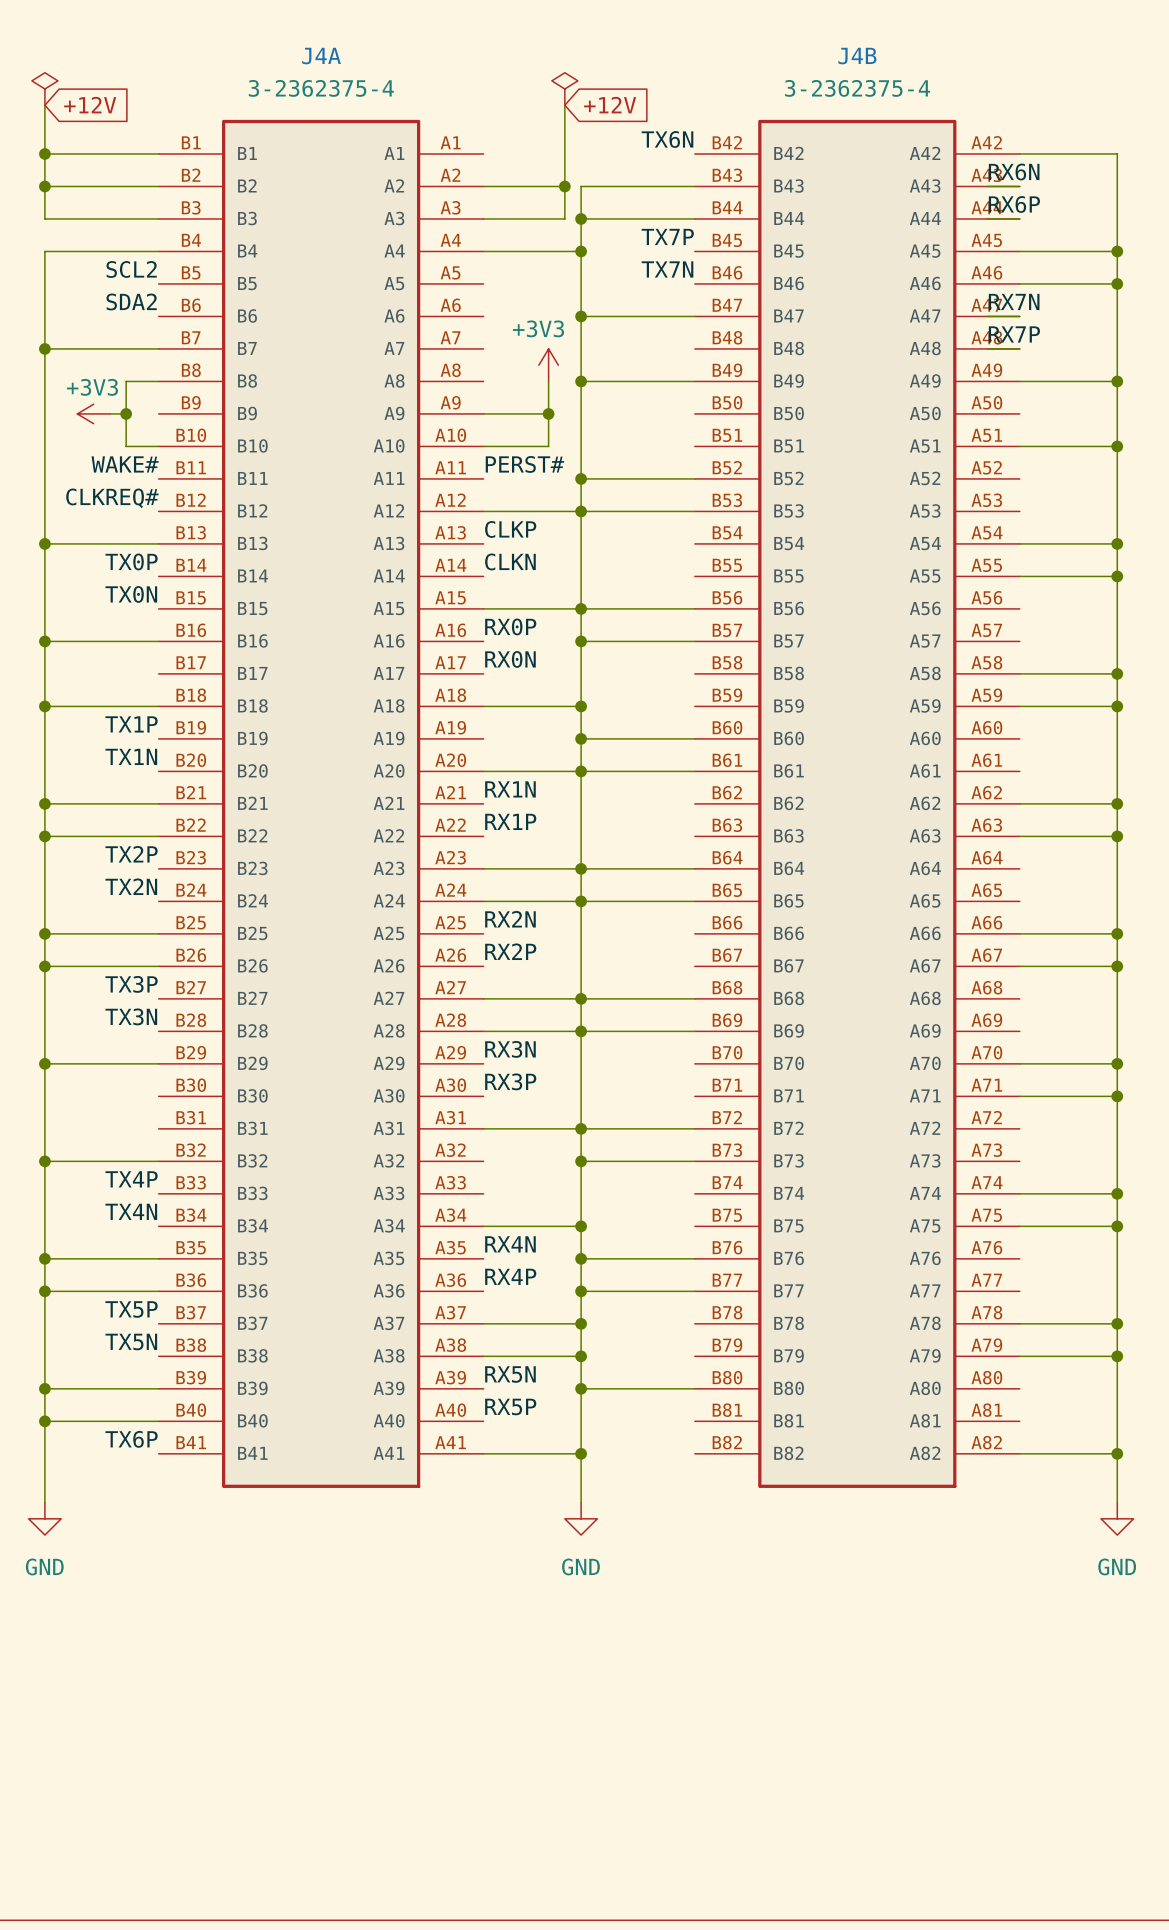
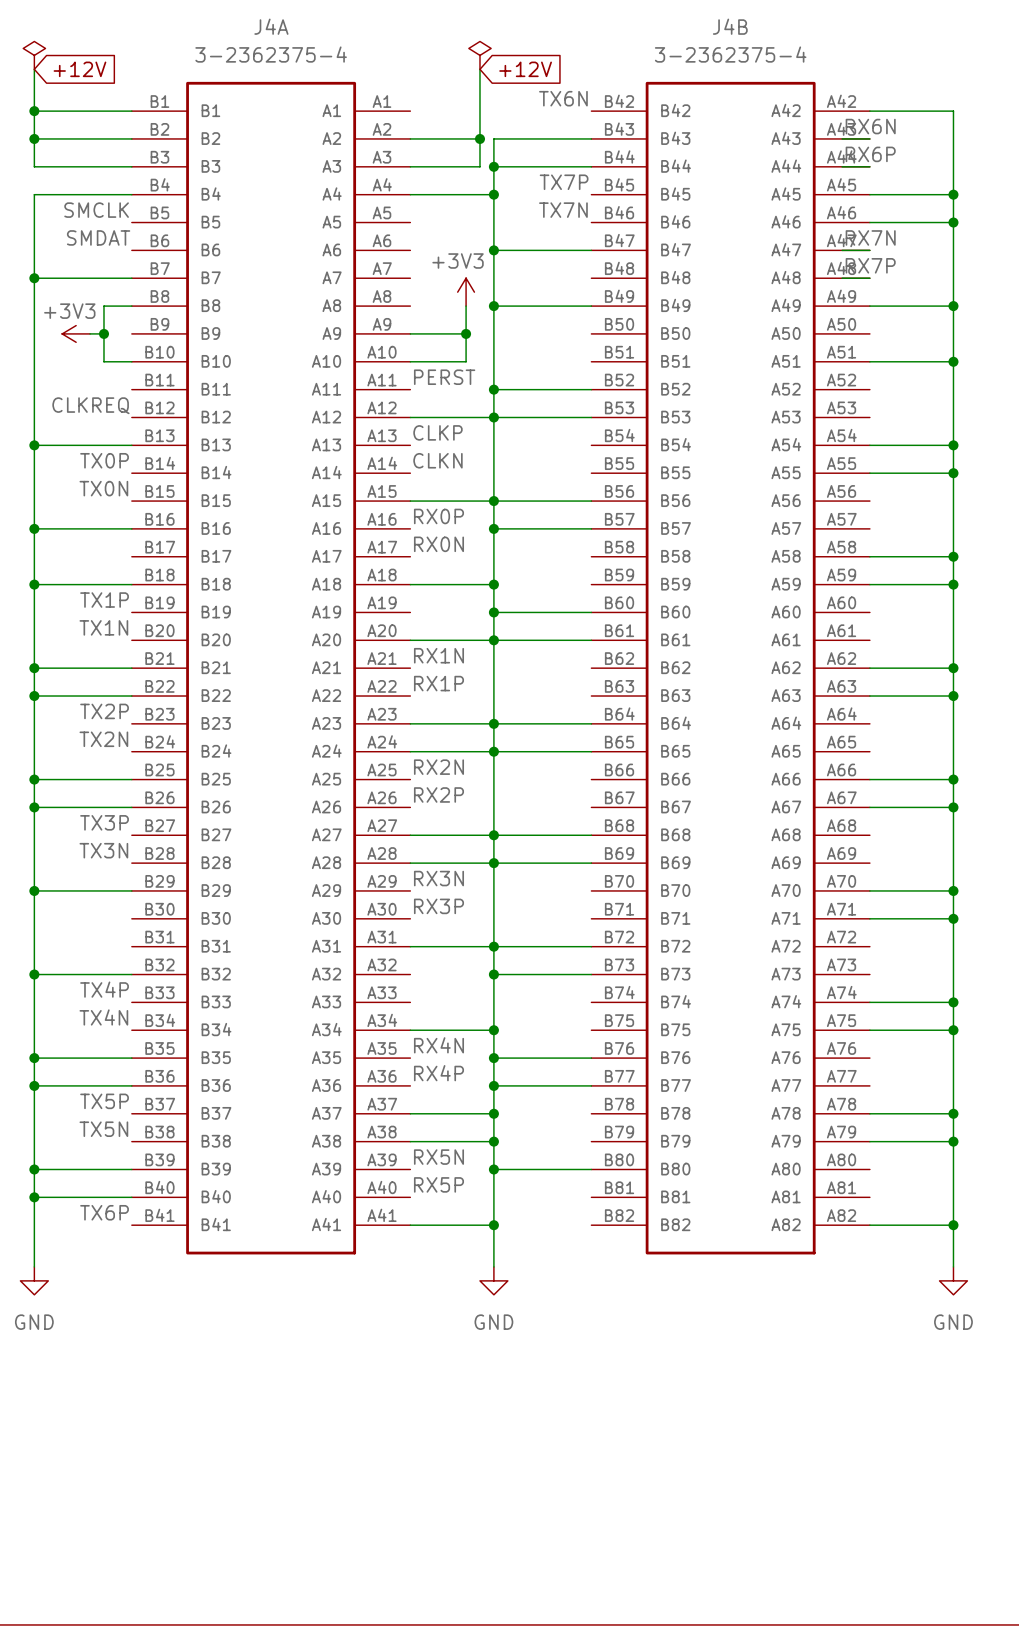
label: SCL2 (131, 269) -> SMCLK (96, 210)
label: SDA2 (131, 301) -> SMDAT (98, 237)
label: WAKE# (125, 464) -> none
label: PERST# (524, 464) -> PERST (444, 377)
label: CLKREQ# (112, 498) -> CLKREQ (90, 405)

